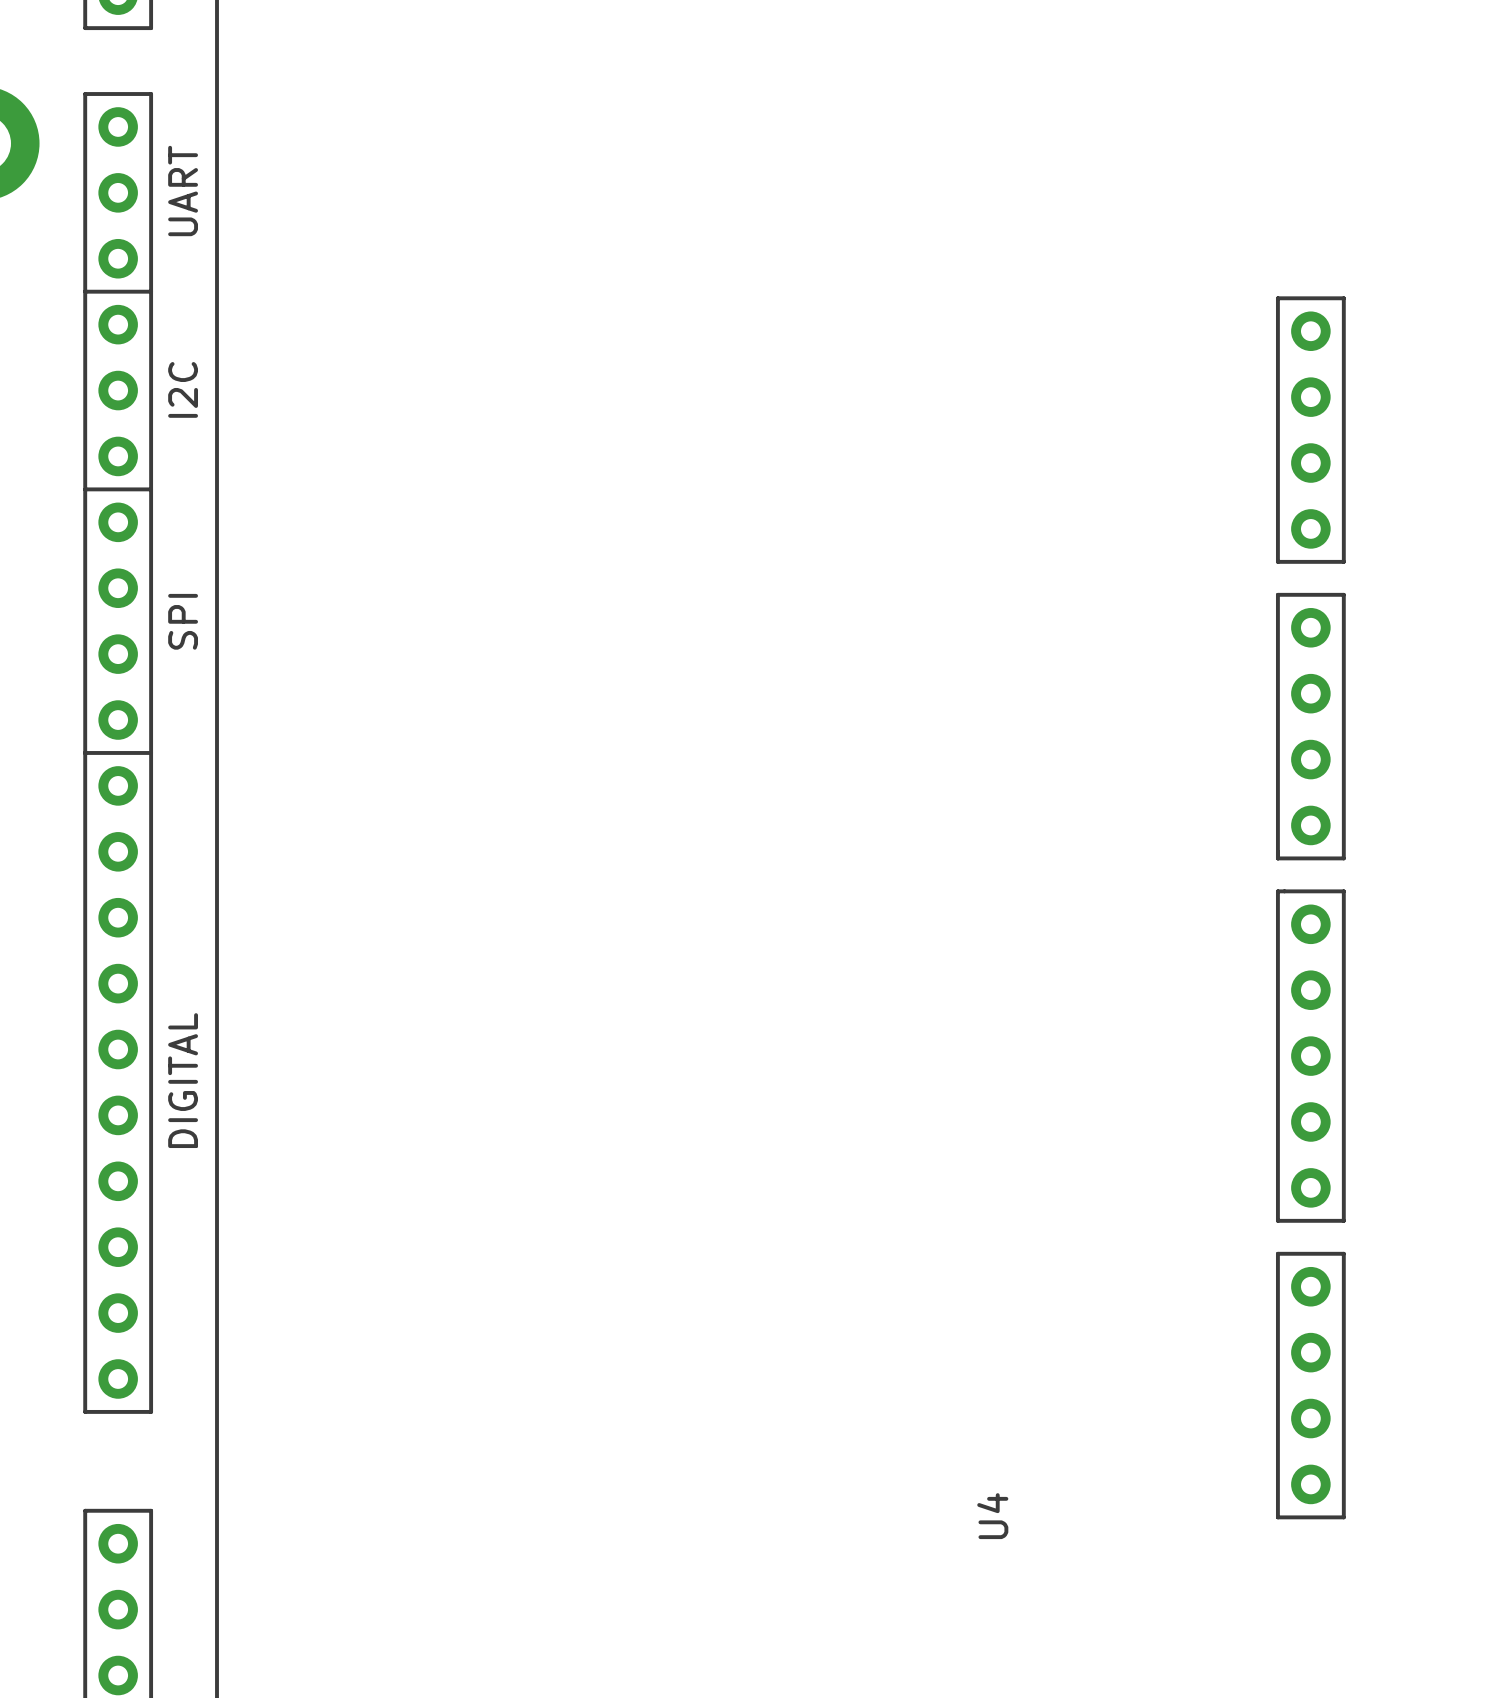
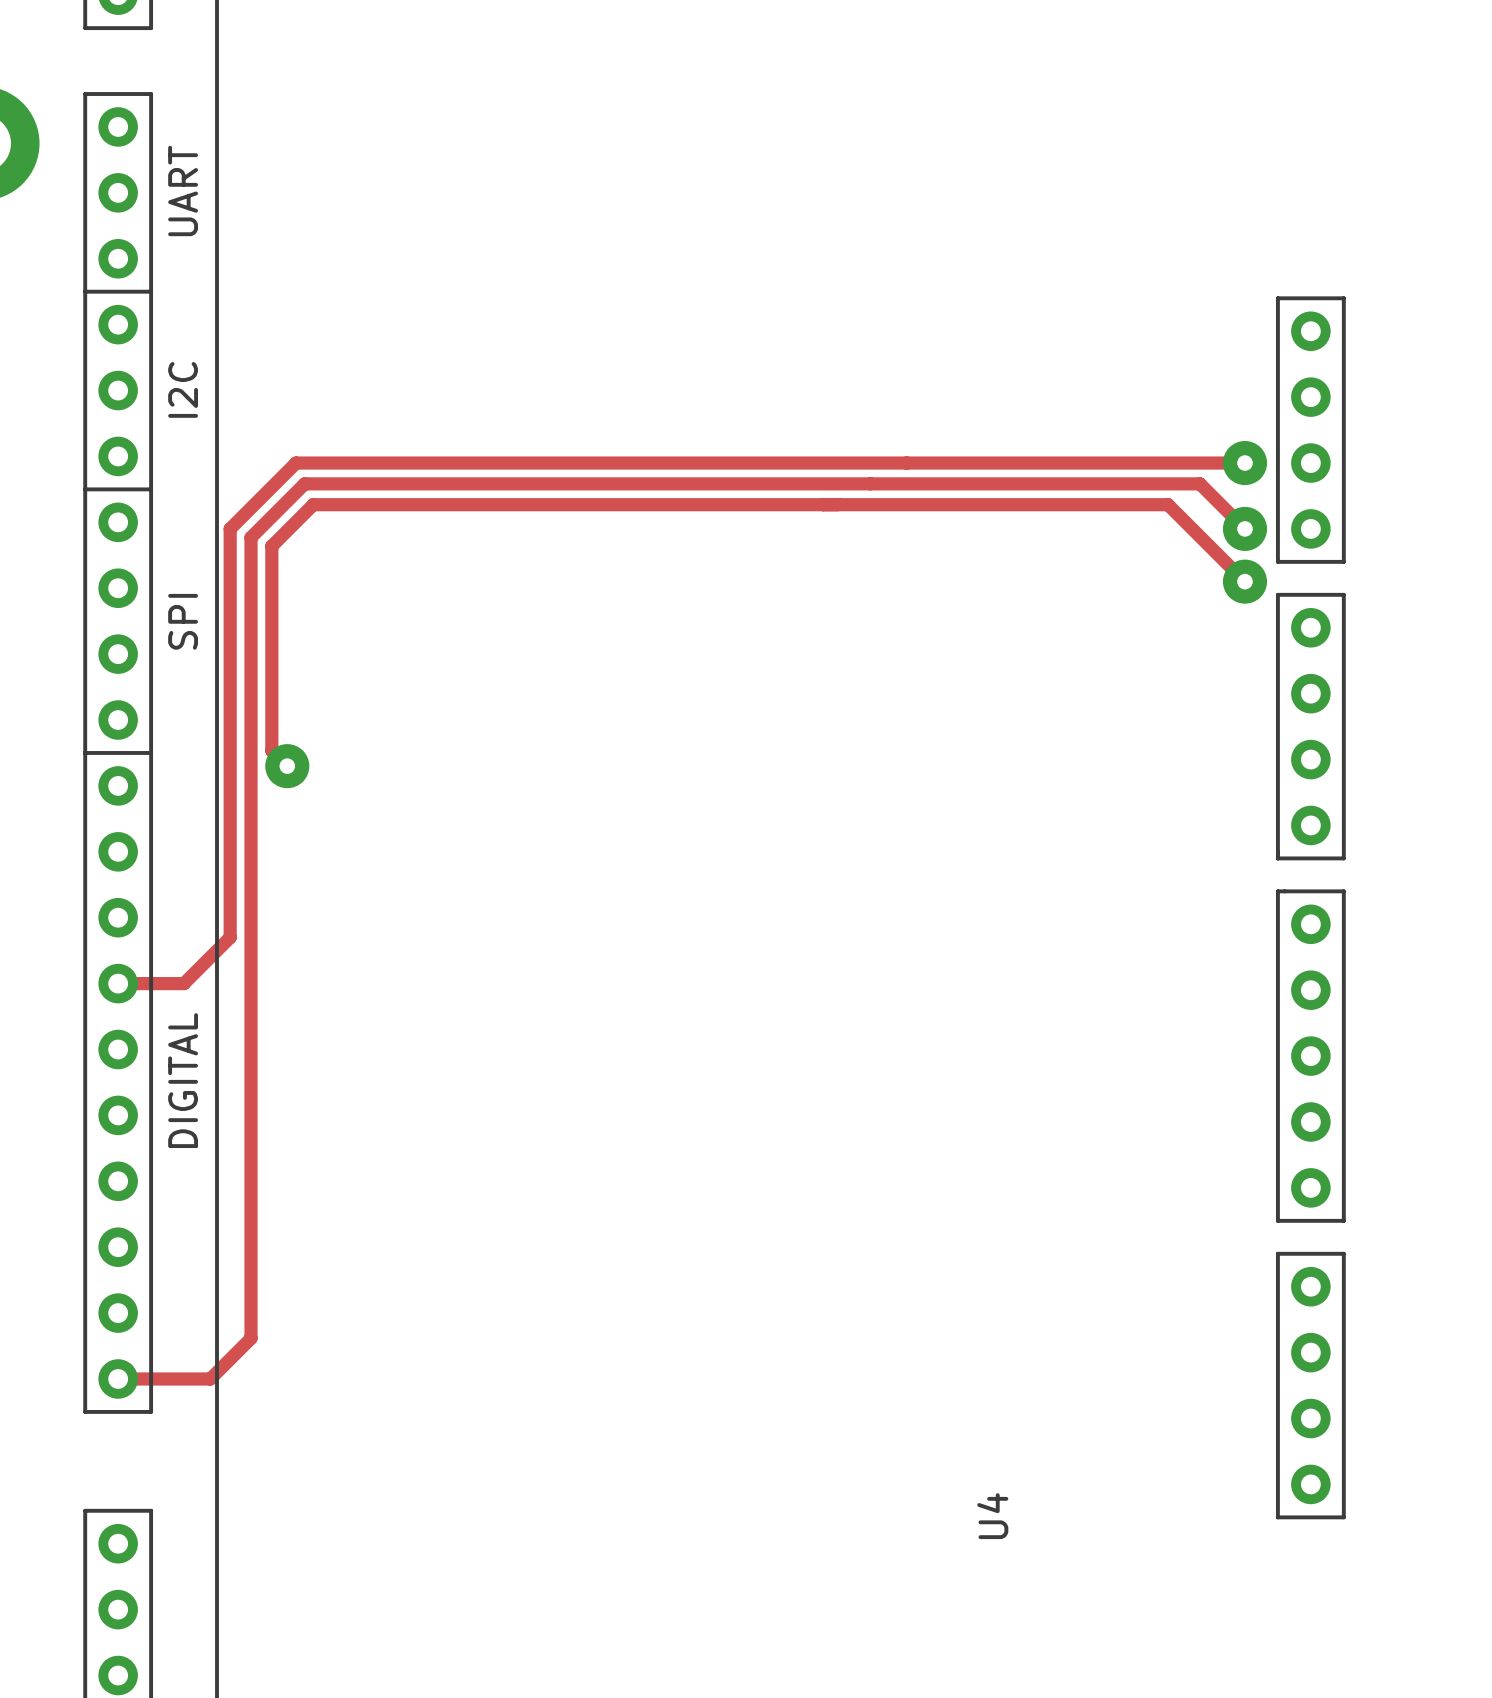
track: none -> (1244, 463) (296, 463) (230, 528) (230, 937) (184, 983) (118, 983)
via: none -> (1244, 463)
track: none -> (1244, 528) (1199, 483) (304, 483) (251, 537) (251, 1338) (210, 1378) (118, 1378)
via: none -> (1244, 528)
track: none -> (1244, 581) (1168, 504) (313, 504) (271, 546) (271, 750) (287, 766)
via: none -> (1244, 581)
via: none -> (287, 766)

